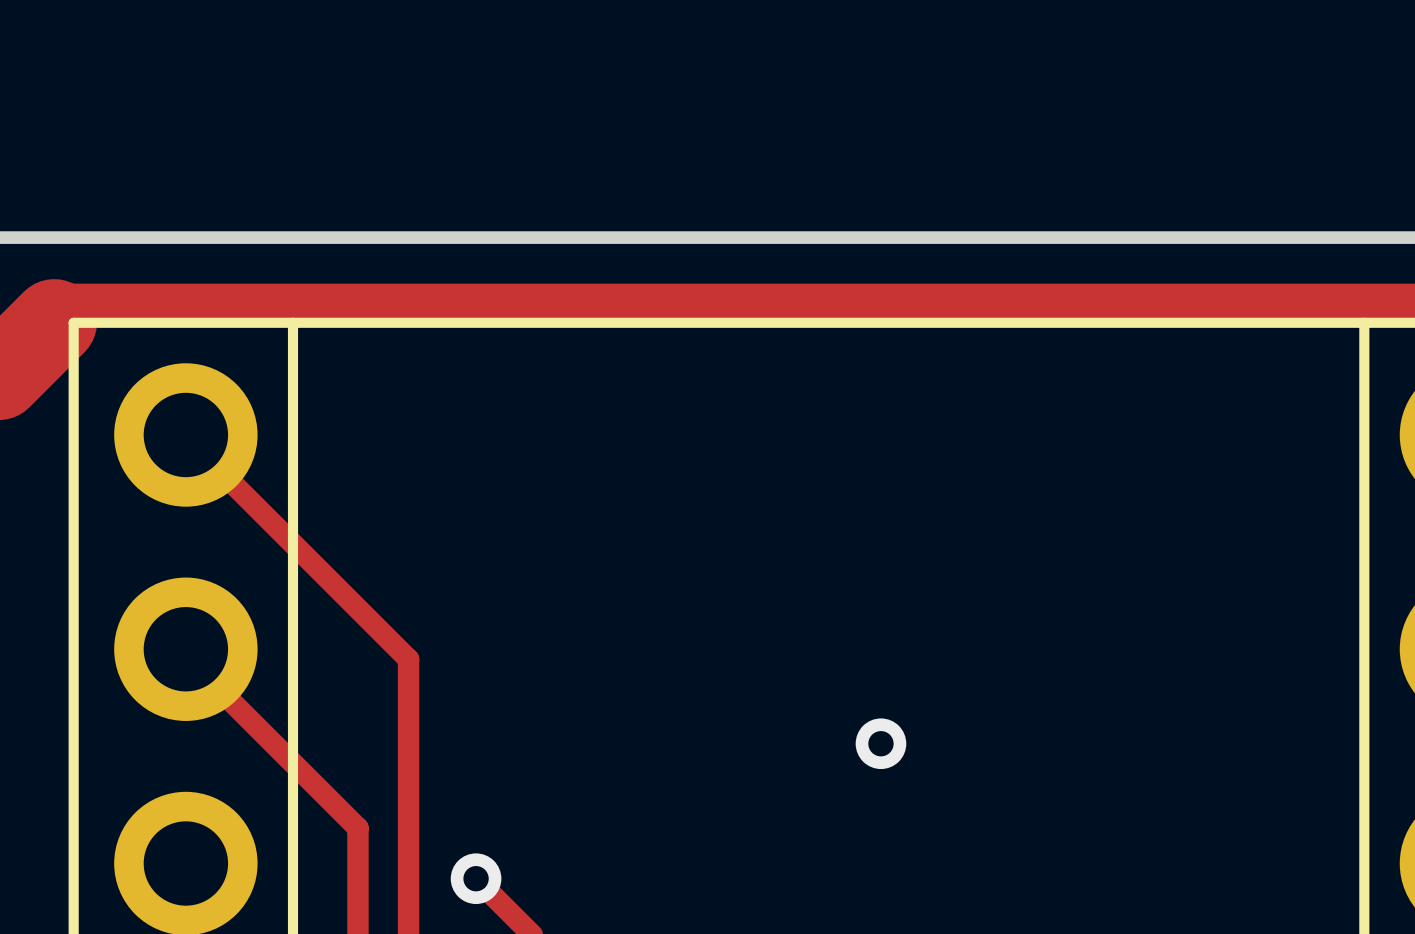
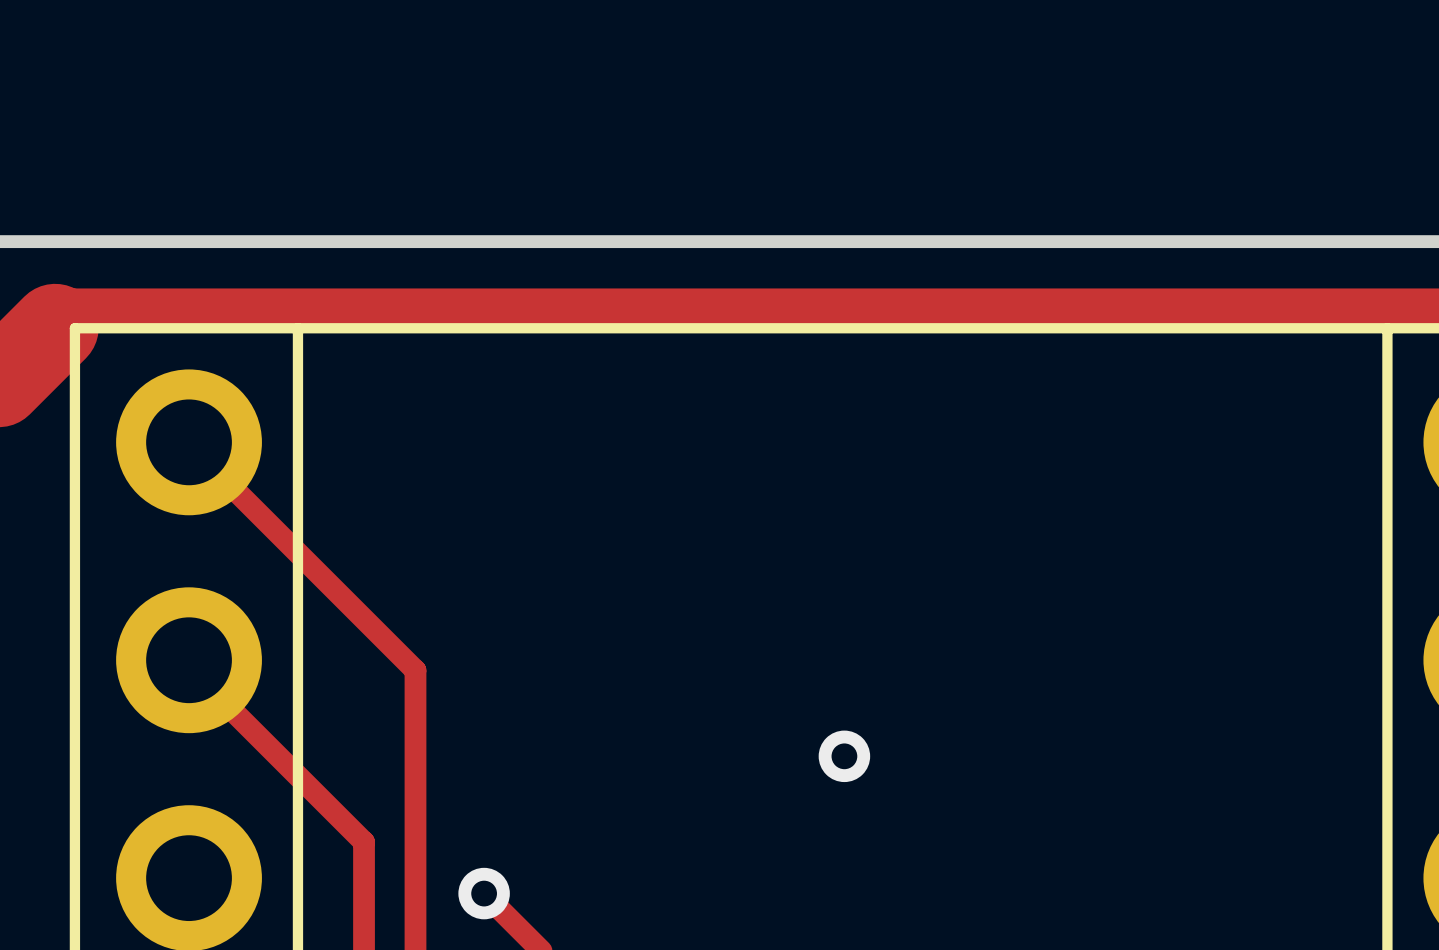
via position: (880, 743) -> (844, 756)

